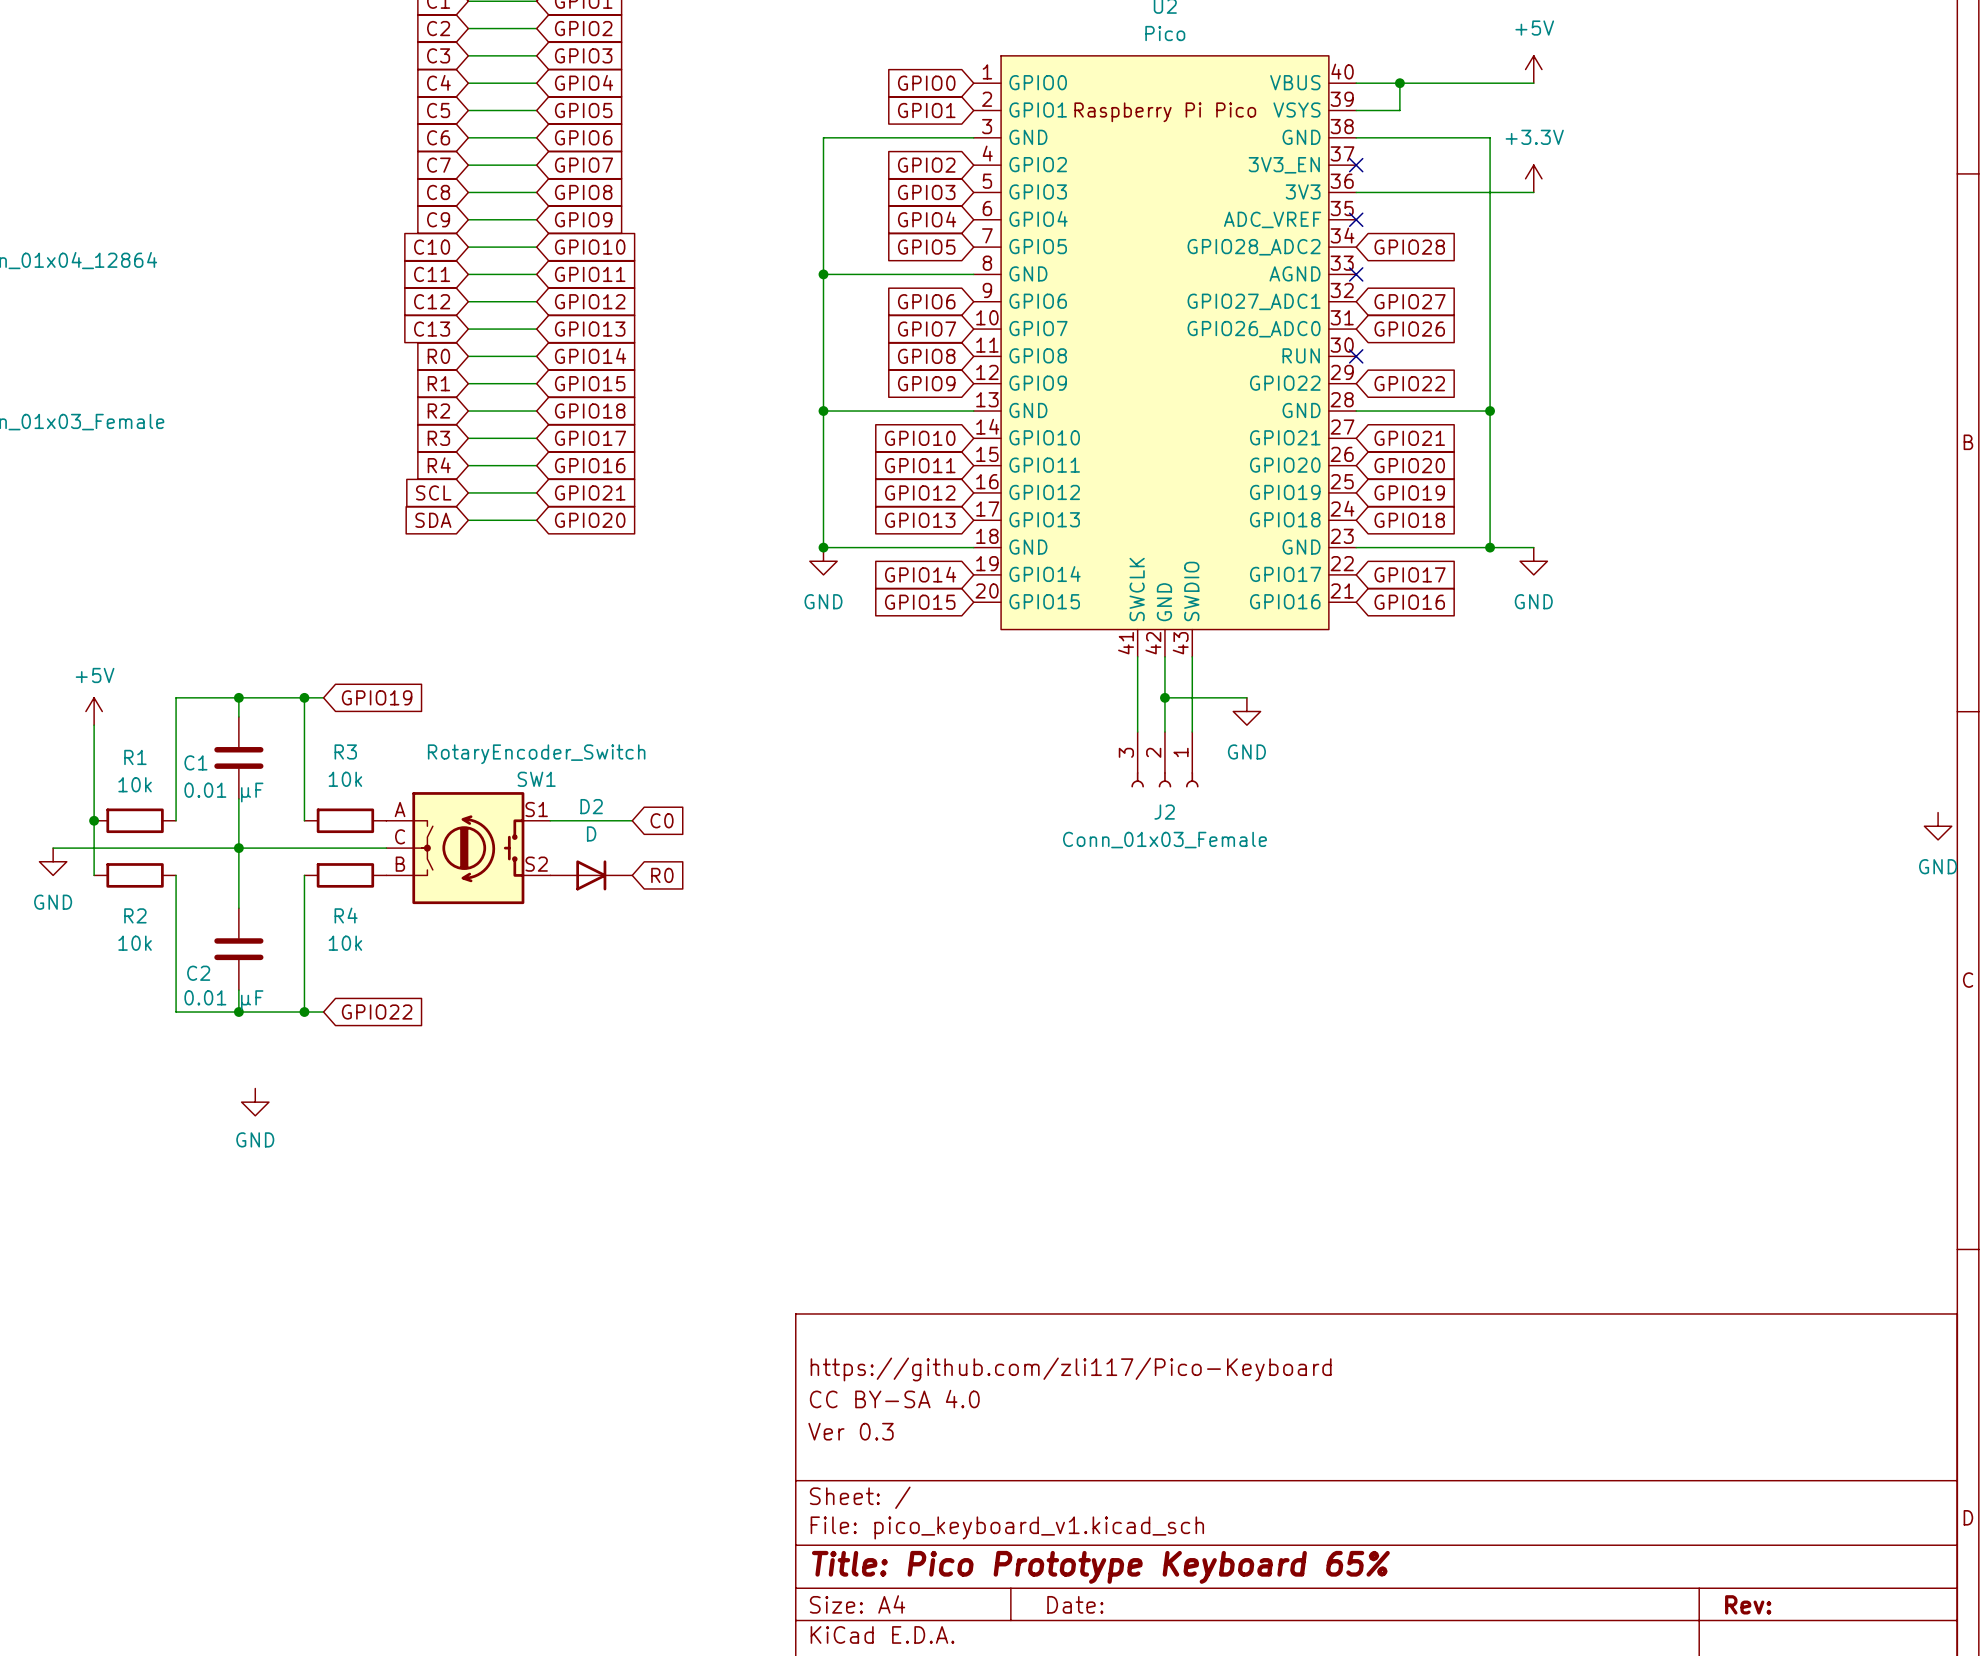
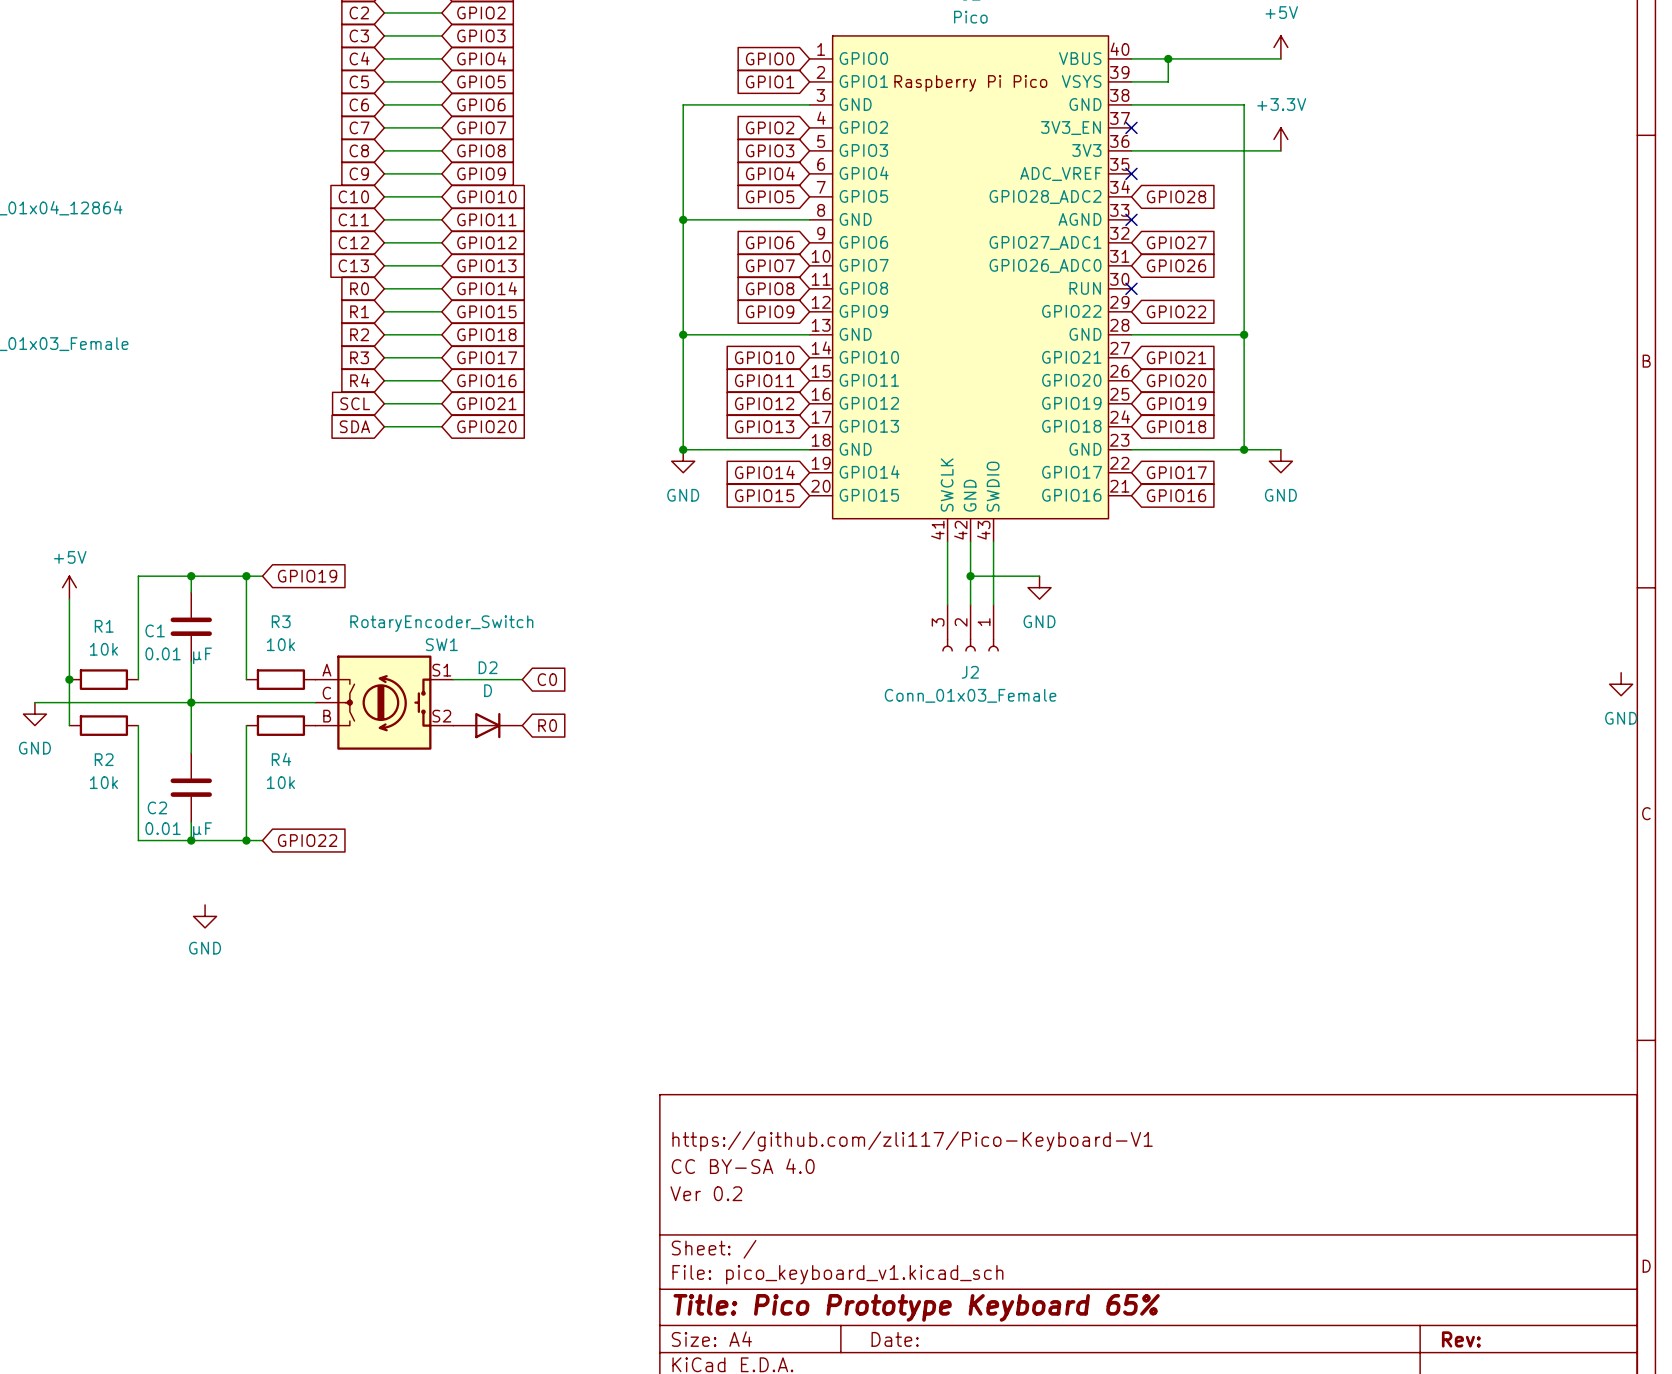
title block: https://github.com/zli117/Pico-Keyboard (1071, 1369) -> https://github.com/zli117/Pico-Keyboard-V1 (912, 1141)
title block: Ver 0.3 (851, 1431) -> Ver 0.2 (706, 1193)

